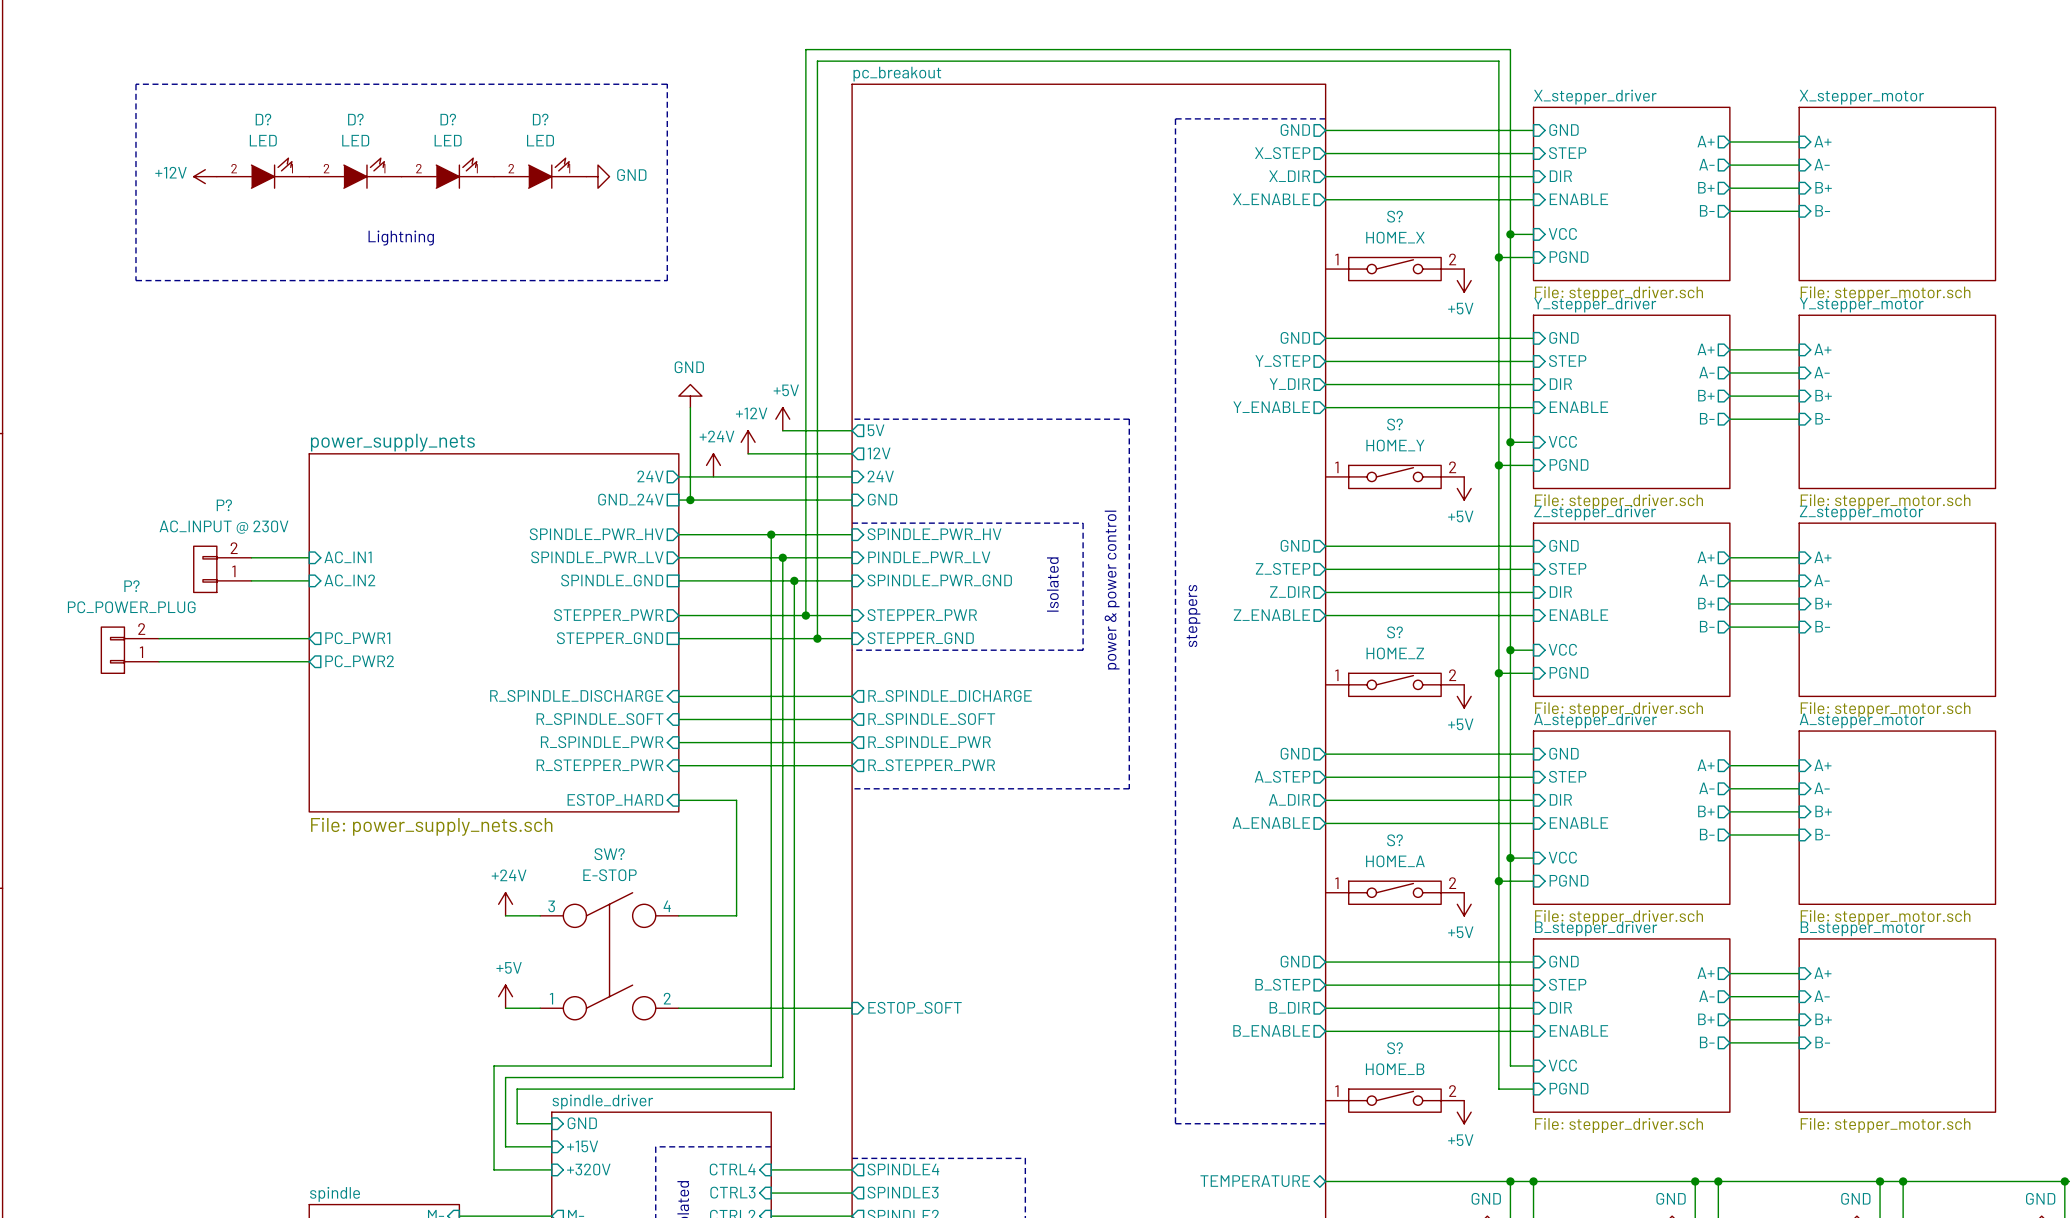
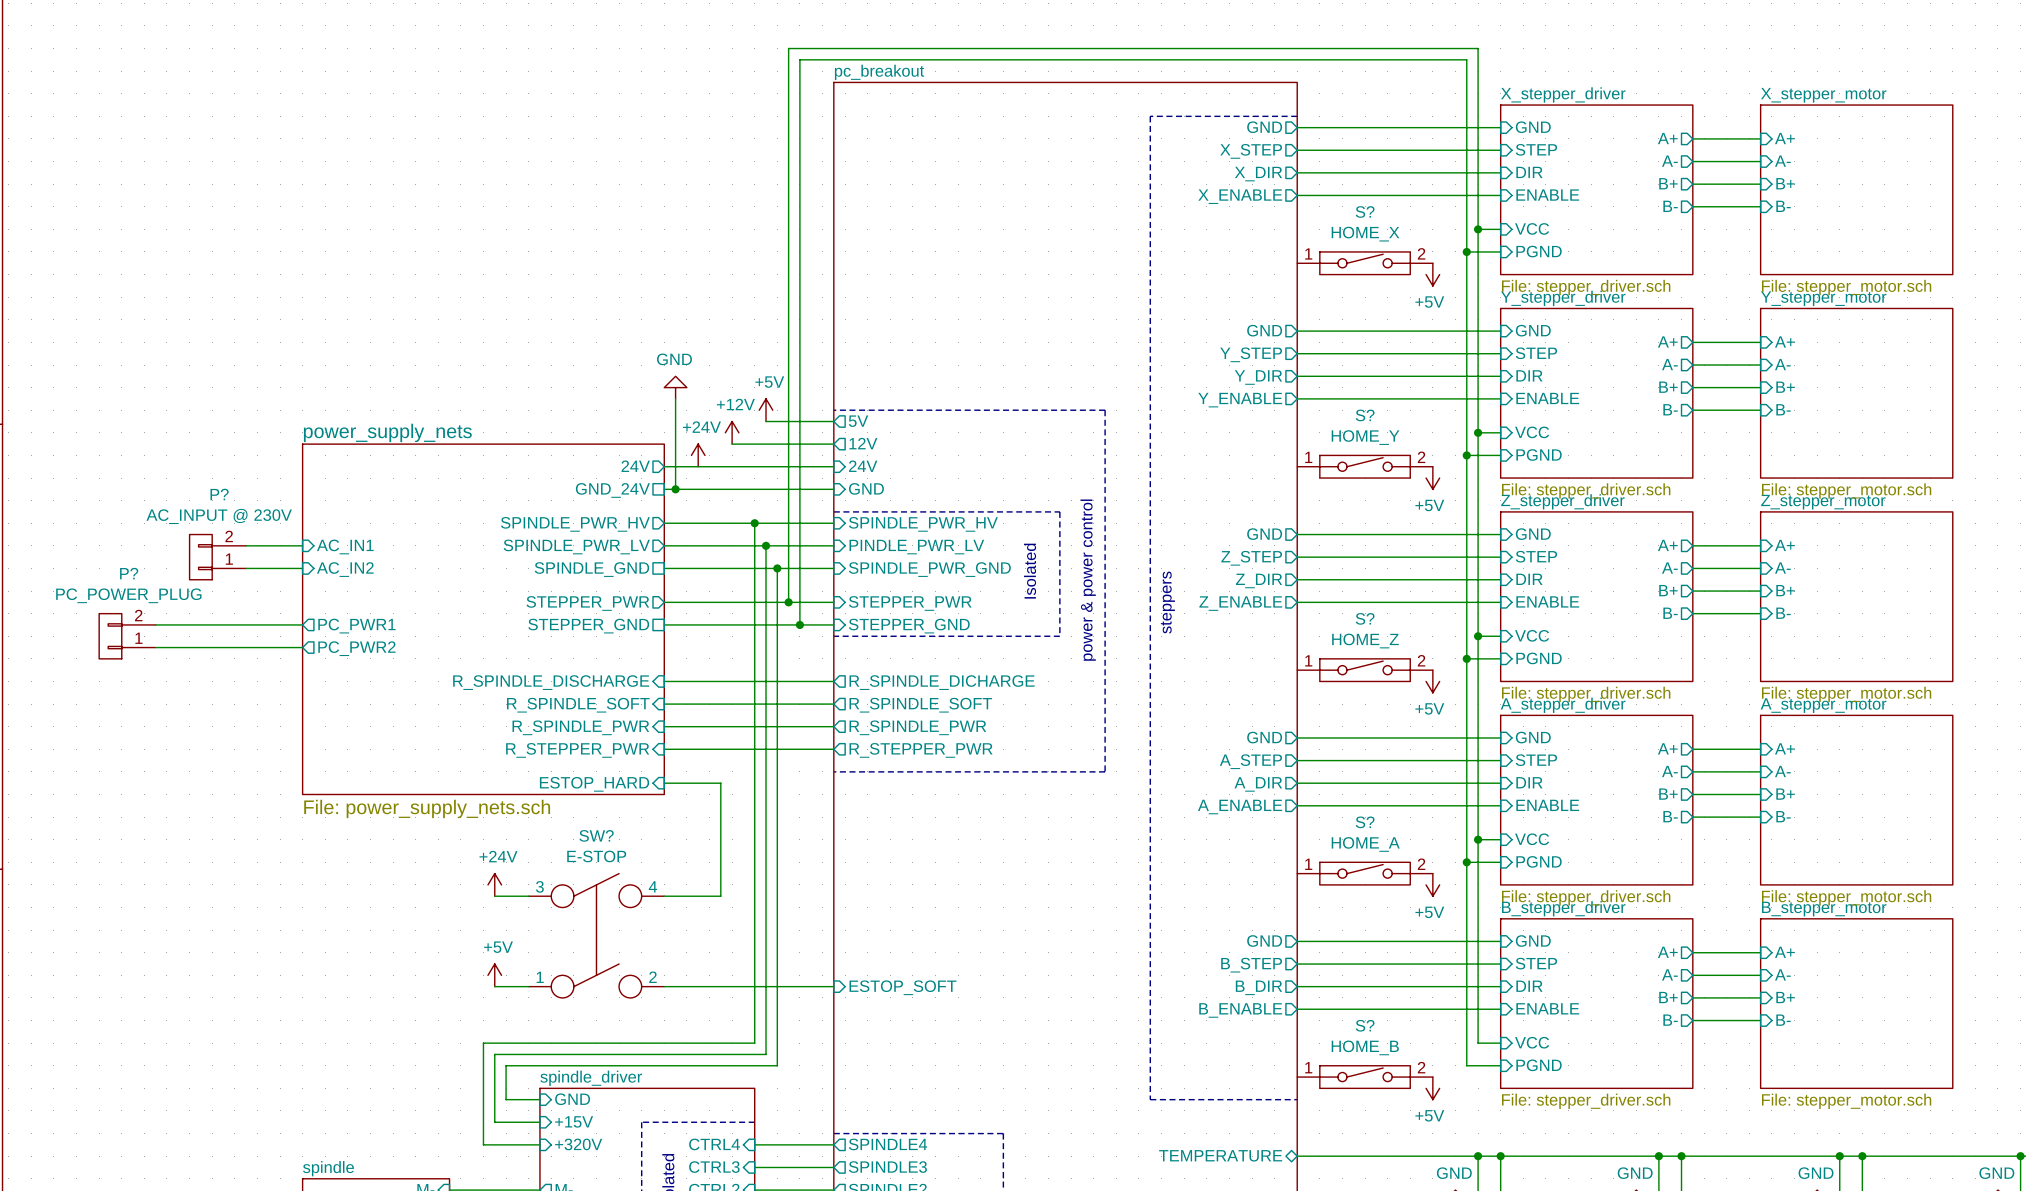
line: (135, 84) (135, 280) (667, 280) (667, 84) (135, 84) -> none
D?: LED (263, 173) -> none
D?: LED (355, 173) -> none
D?: LED (447, 173) -> none
D?: LED (540, 173) -> none
power symbol: +12V (205, 176) -> none
power symbol: GND (597, 176) -> none
text: Lightning (401, 238) -> none

